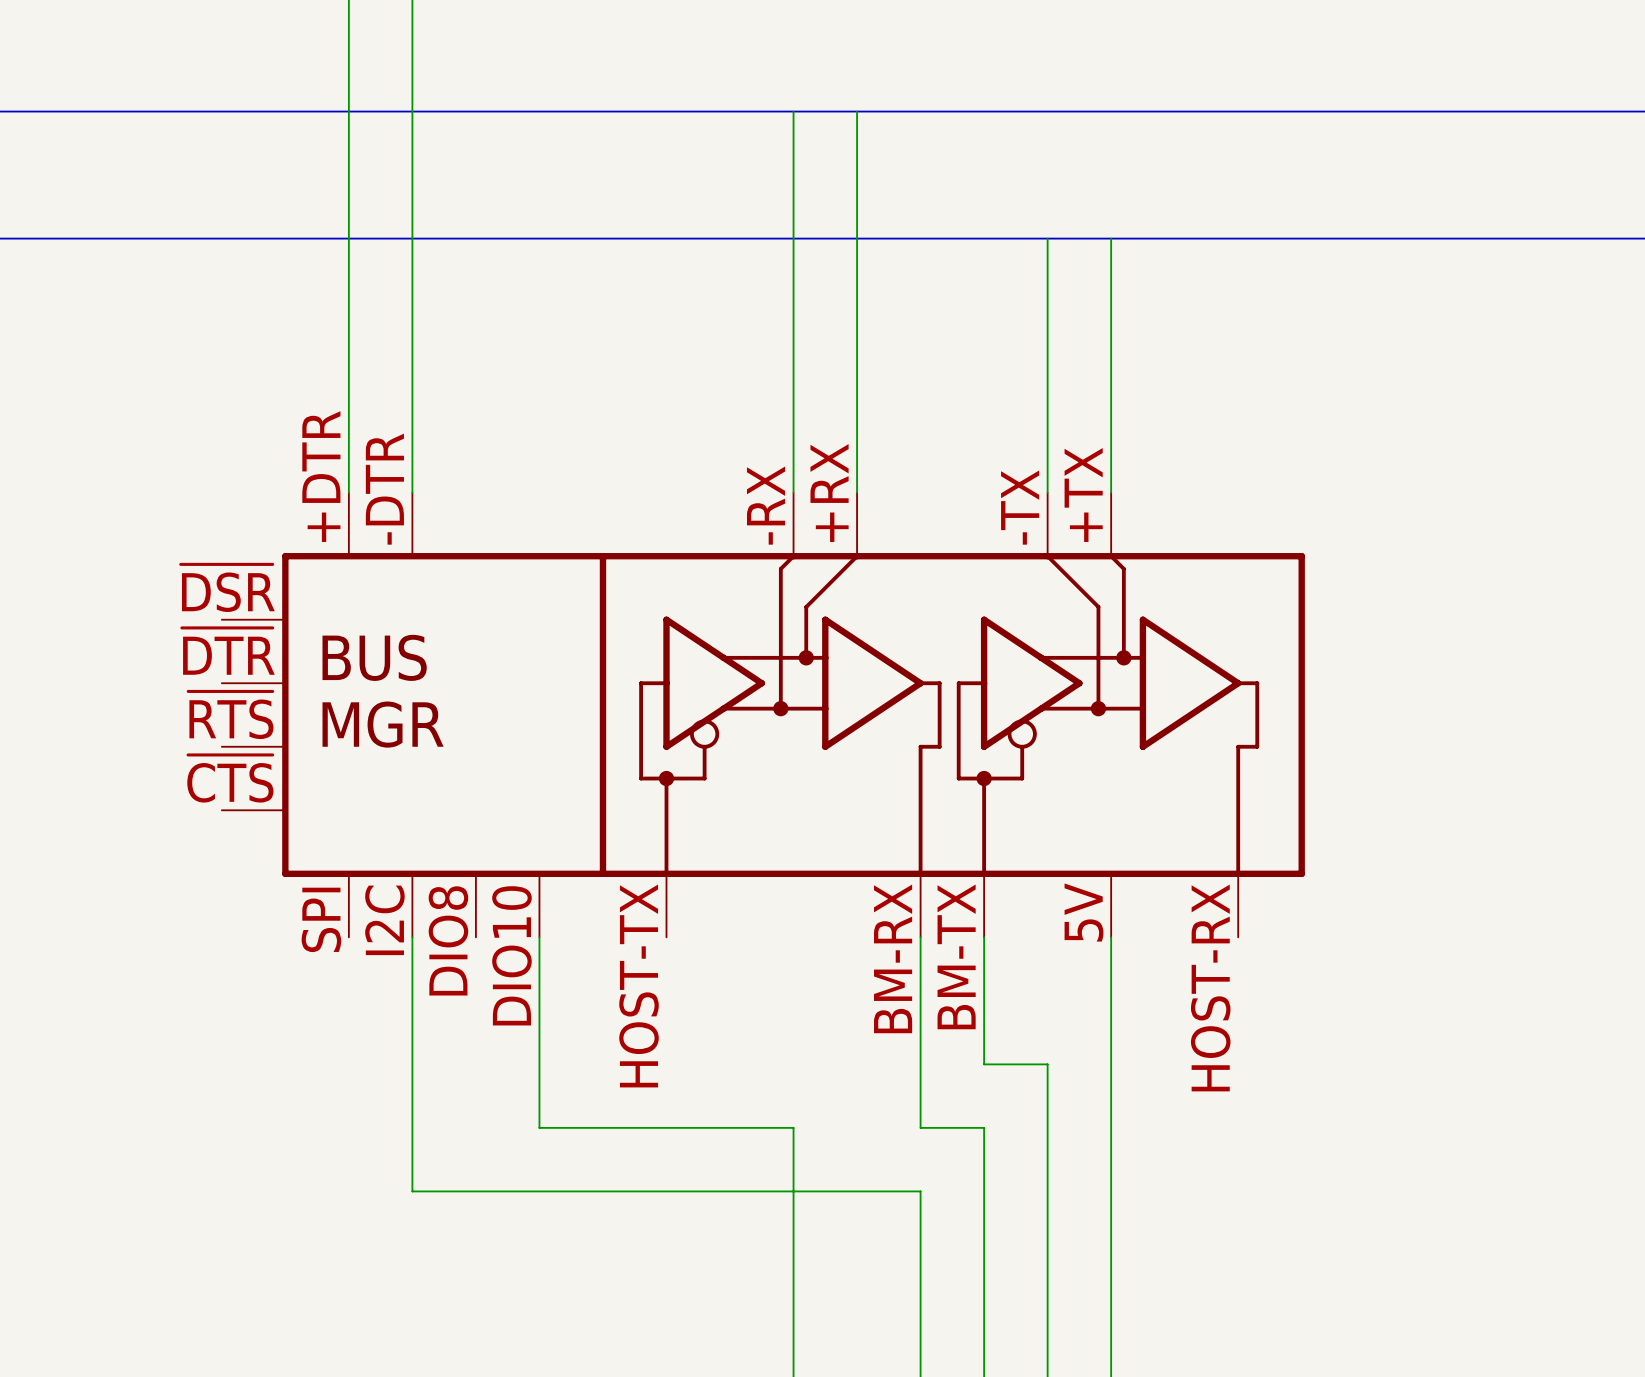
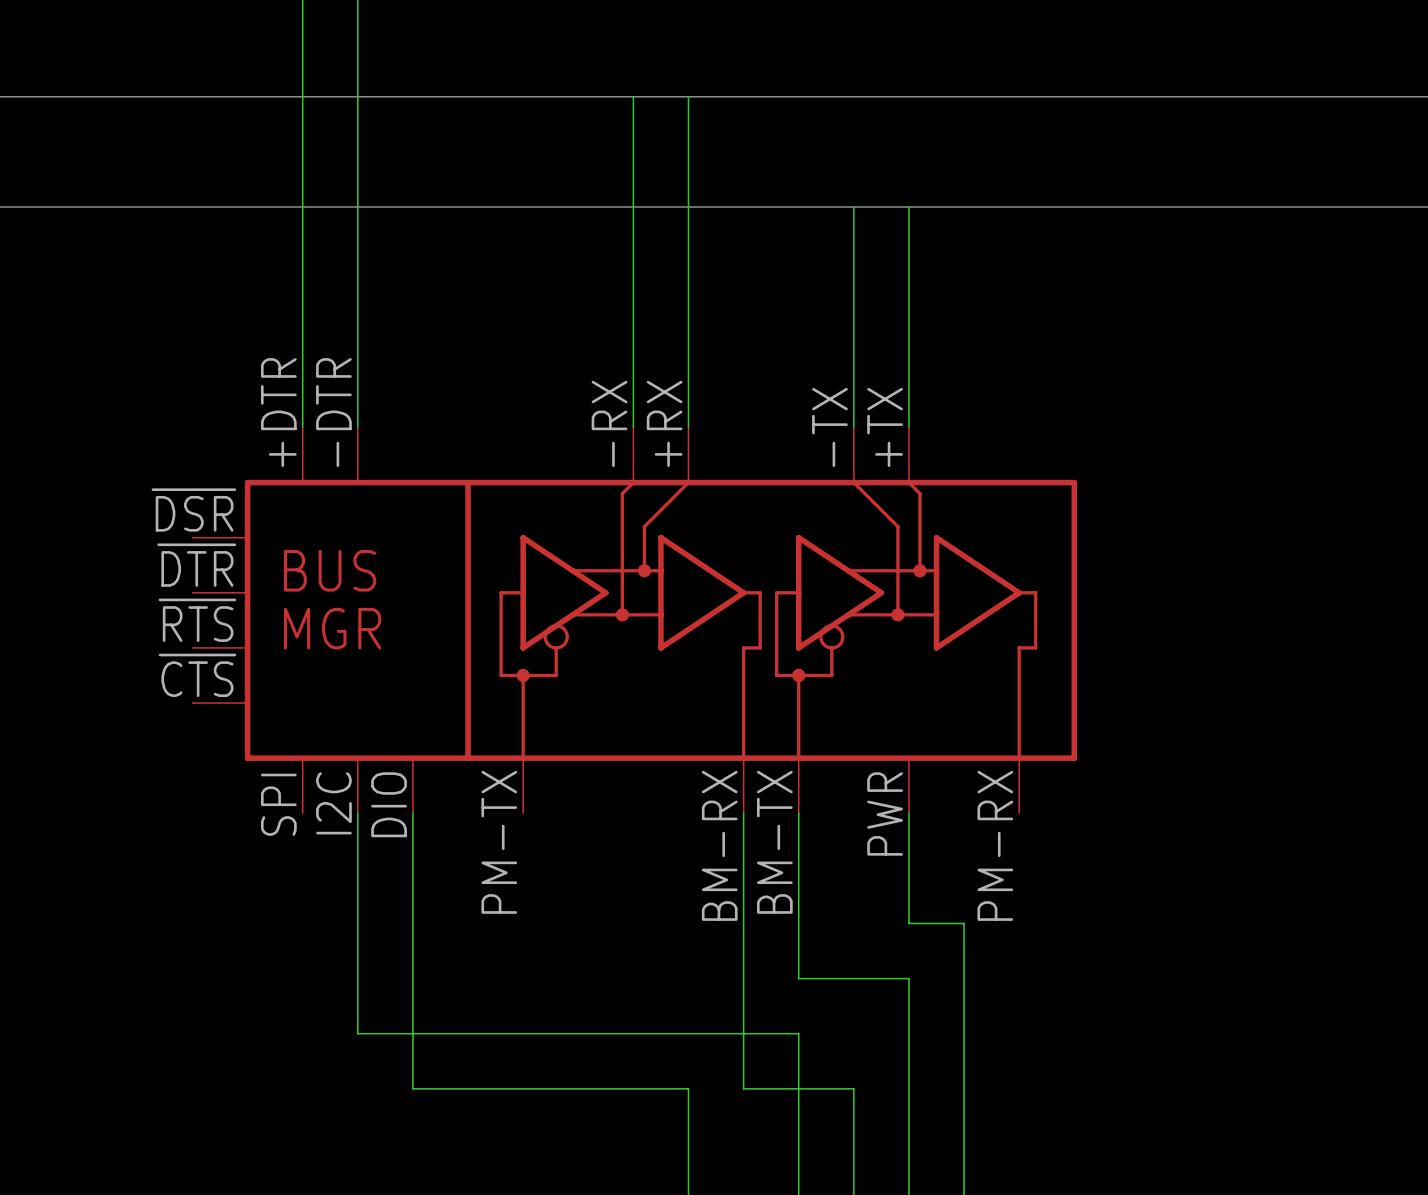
wire: (857, 111) (857, 492) -> (633, 96) (633, 427)
wire: (1111, 238) (1111, 492) -> (853, 207) (853, 427)
part: none -> (634, 620)
part: (763, 715) -> none
wire: (539, 937) (539, 1127) (793, 1127) (793, 1254) -> (412, 813) (412, 1088) (688, 1088)
wire: none -> (743, 813) (743, 1088) (853, 1088)
wire: (984, 937) (984, 1064) (1047, 1064) (1047, 1127) -> none
wire: (1111, 937) (1111, 1064) -> (908, 813) (908, 923) (964, 923)
wire: (984, 1127) (984, 1254) -> (853, 978) (908, 978)

